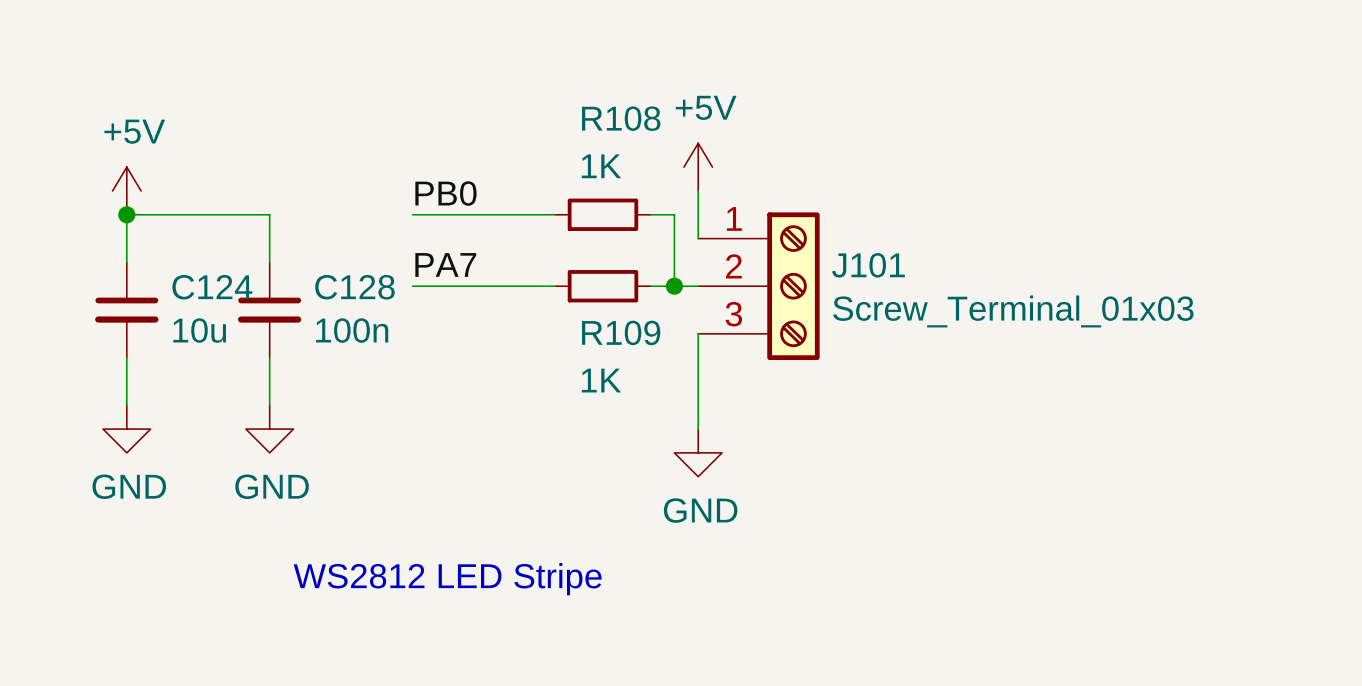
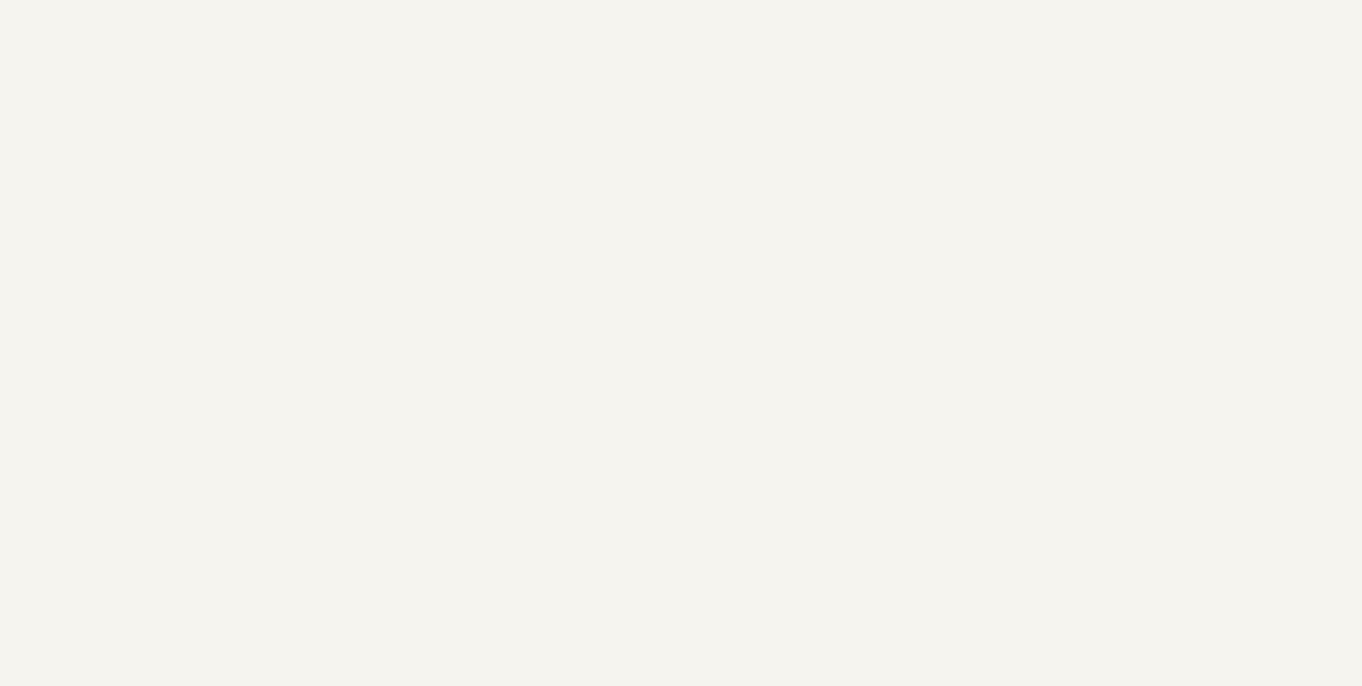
power symbol: +5V (698, 167) -> none
power symbol: +5V (126, 190) -> none
wire: (698, 190) (698, 238) -> none
label: PB0 (445, 193) -> none
junction: (126, 214) -> none
wire: (412, 214) (555, 214) -> none
R108: 1K (602, 214) -> none
wire: (650, 214) (674, 214) (674, 286) -> none
wire: (126, 262) (126, 214) (269, 214) (269, 262) -> none
label: PA7 (445, 264) -> none
wire: (412, 286) (555, 286) -> none
R109: 1K (602, 286) -> none
wire: (650, 286) (698, 286) -> none
junction: (674, 286) -> none
J101: Screw_Terminal_01x03 (758, 286) -> none
C124: 10u (126, 310) -> none
C128: 100n (269, 310) -> none
wire: (698, 333) (698, 429) -> none
wire: (126, 357) (126, 405) -> none
wire: (269, 357) (269, 405) -> none
power symbol: GND (126, 429) -> none
power symbol: GND (269, 429) -> none
power symbol: GND (698, 452) -> none
text: WS2812 LED Stripe (447, 579) -> none

